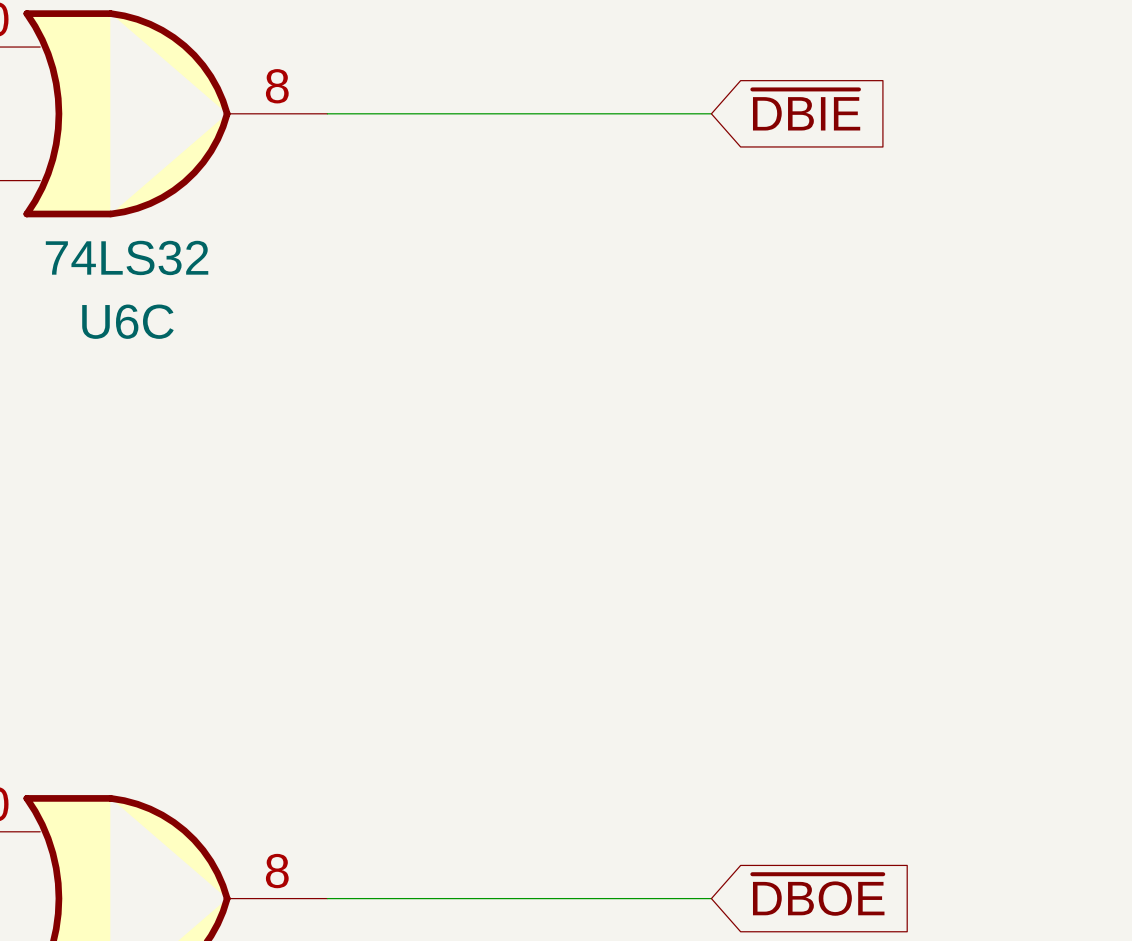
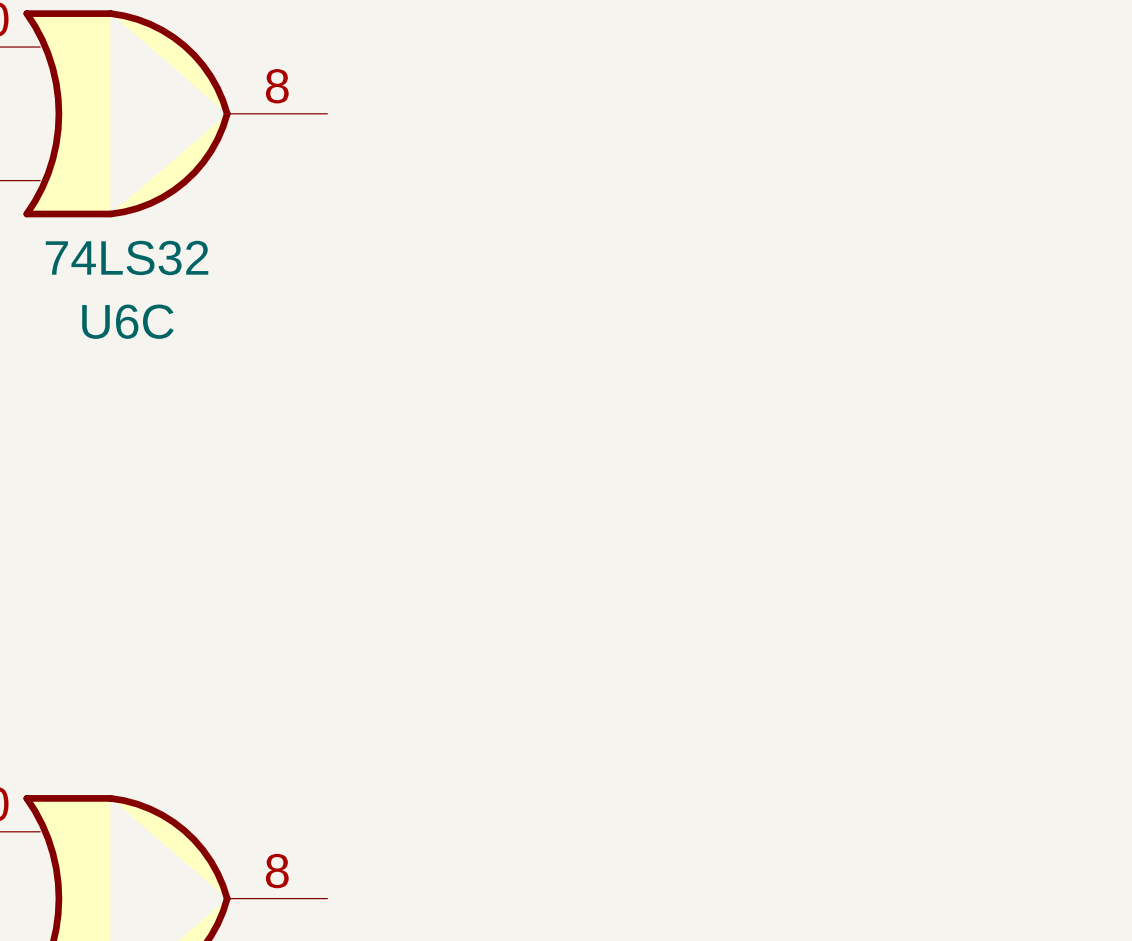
global label: ~{DBIE} (806, 109) -> none
wire: (327, 113) (711, 113) -> none
global label: ~{DBOE} (818, 894) -> none
wire: (327, 898) (711, 898) -> none

